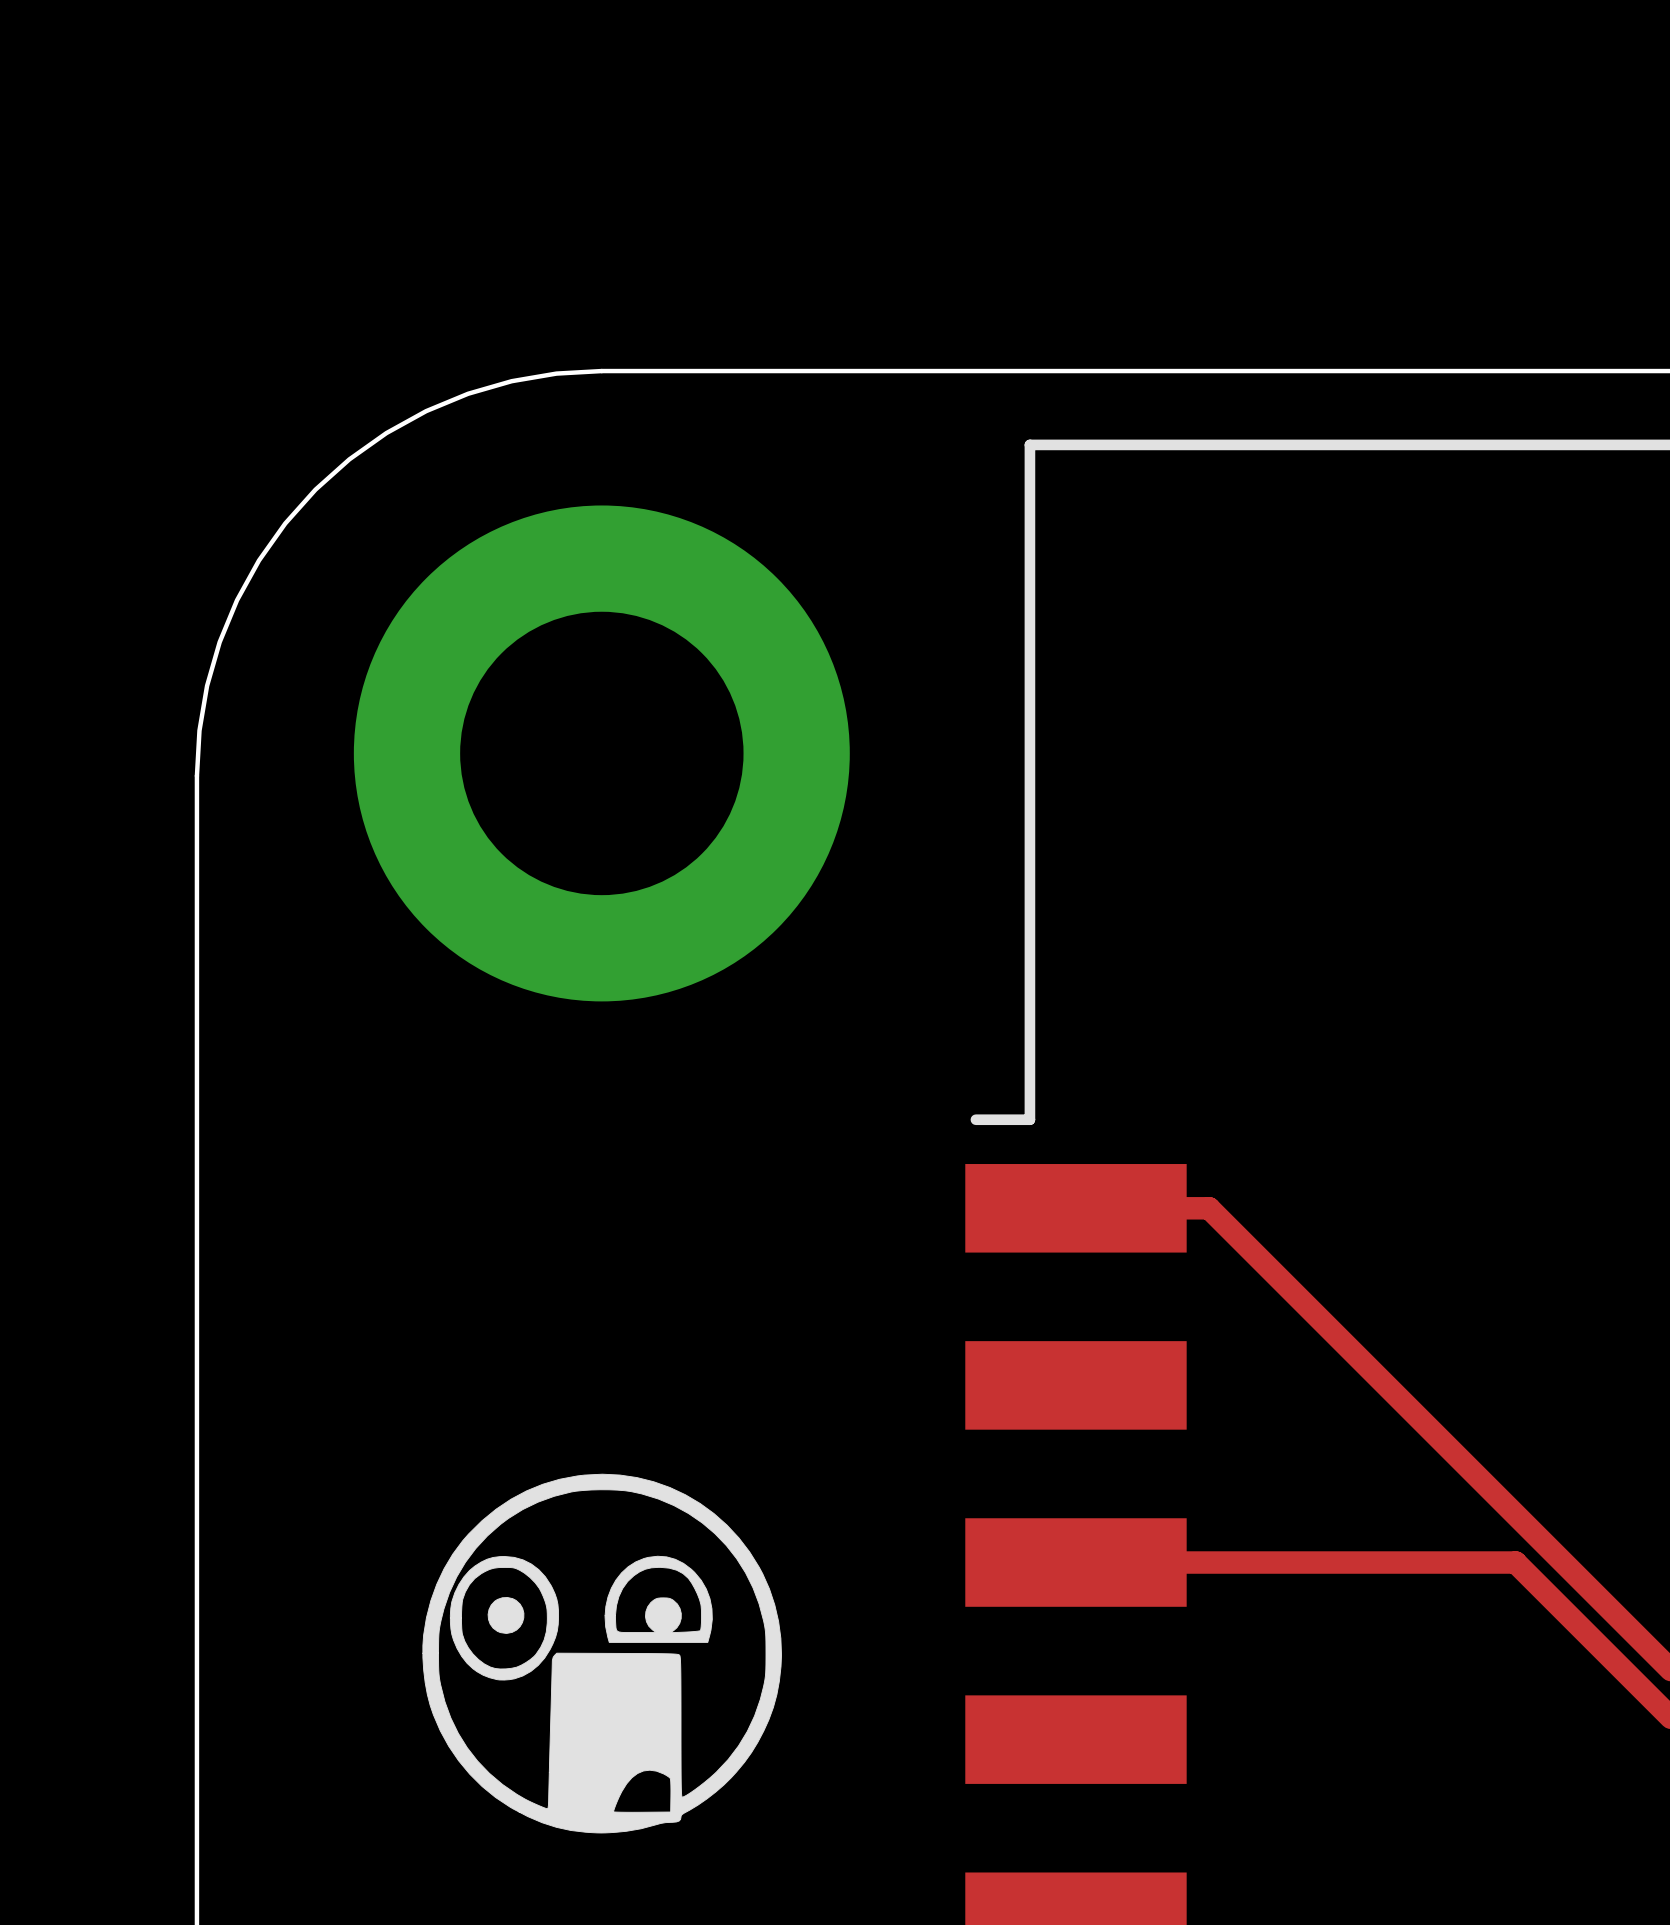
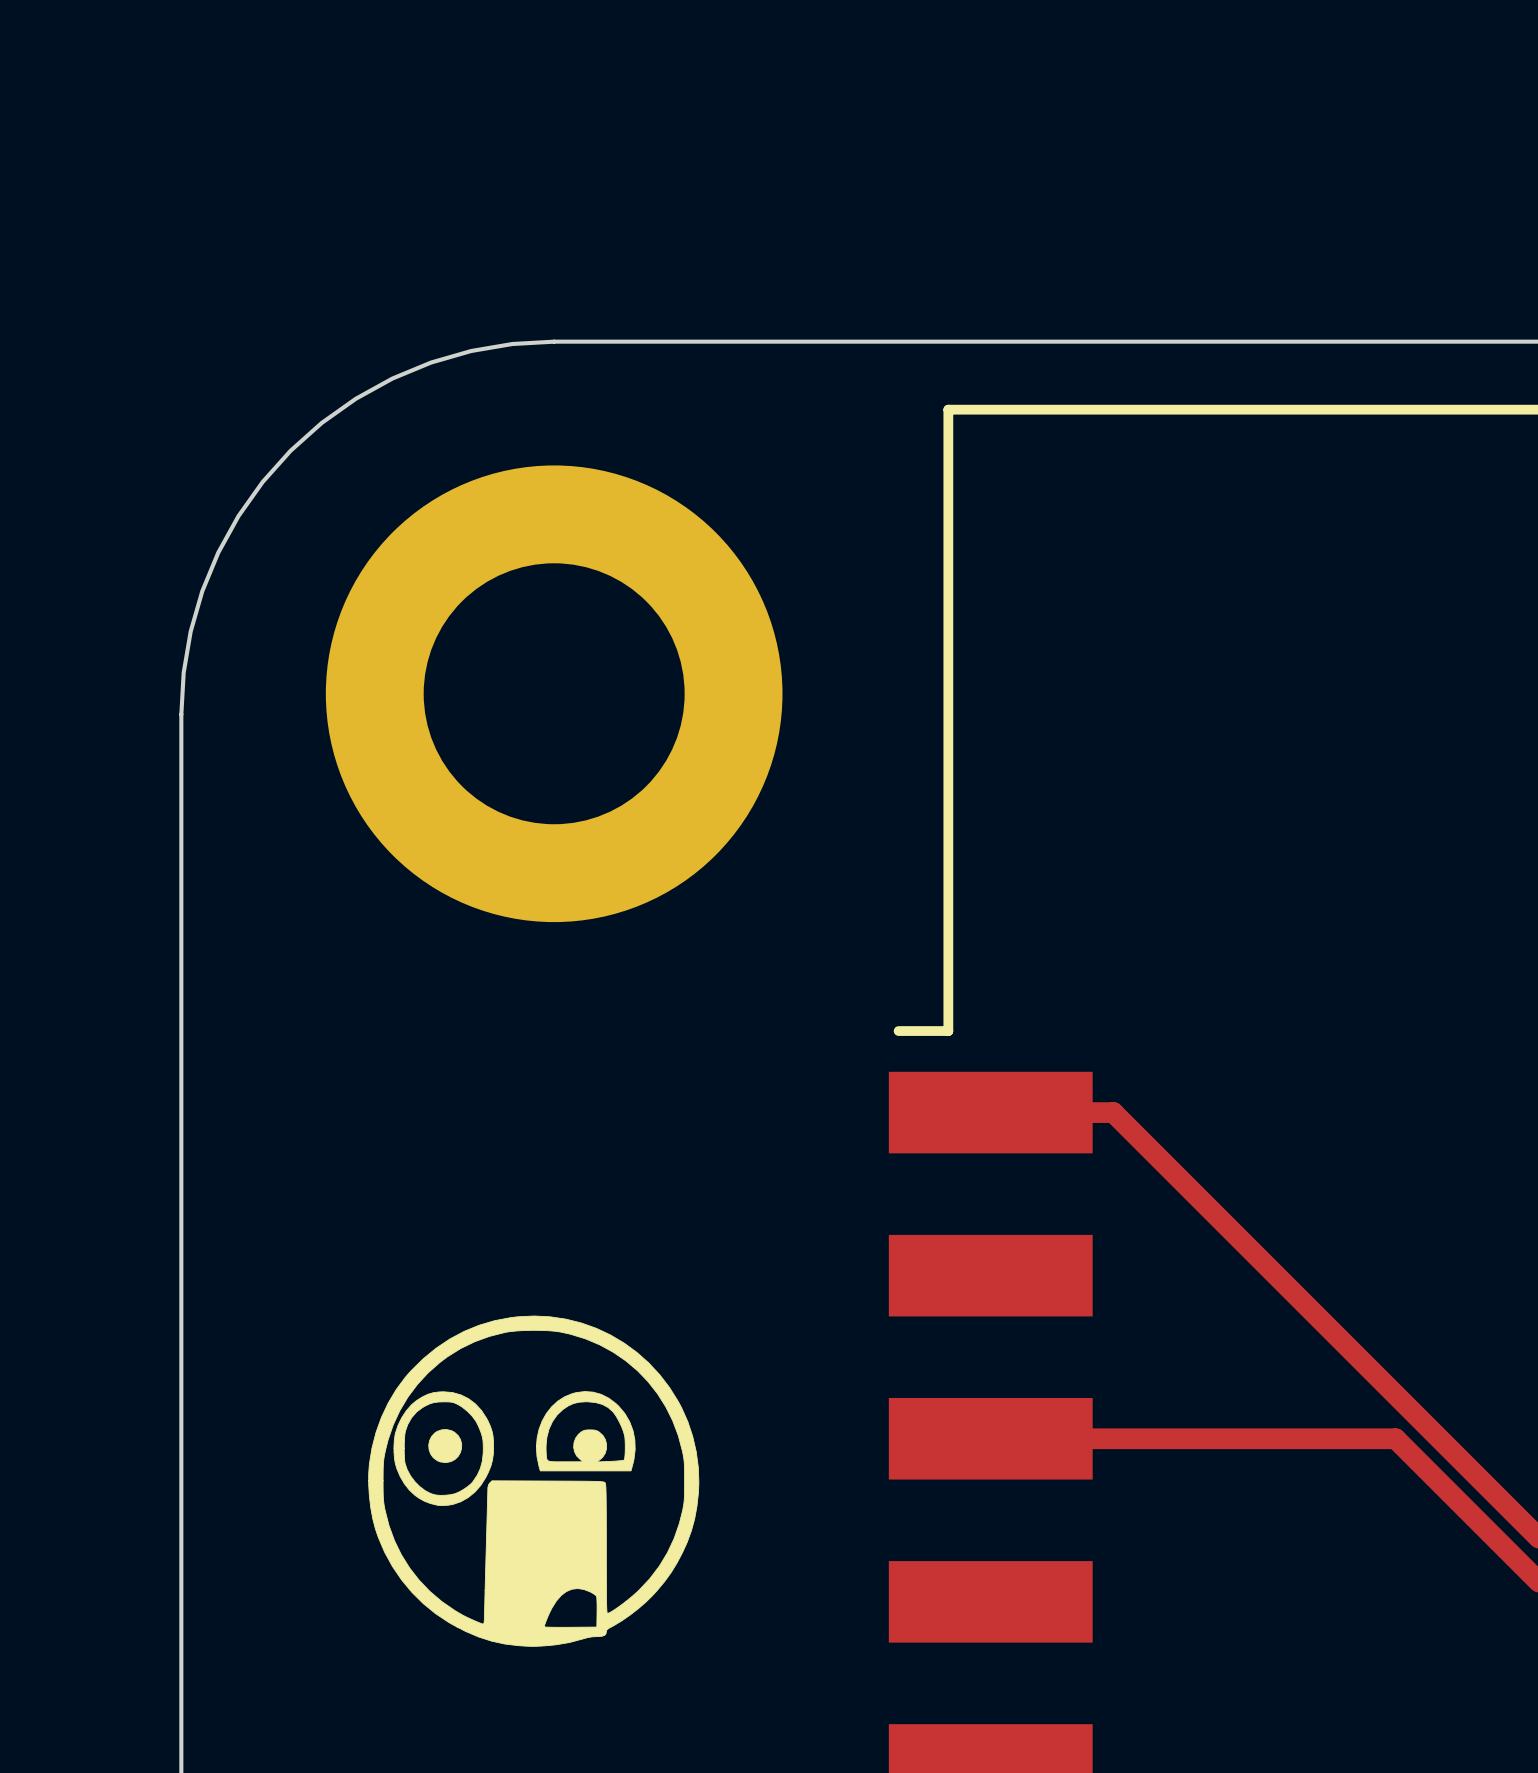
drawing position: (602, 1653) -> (533, 1481)

